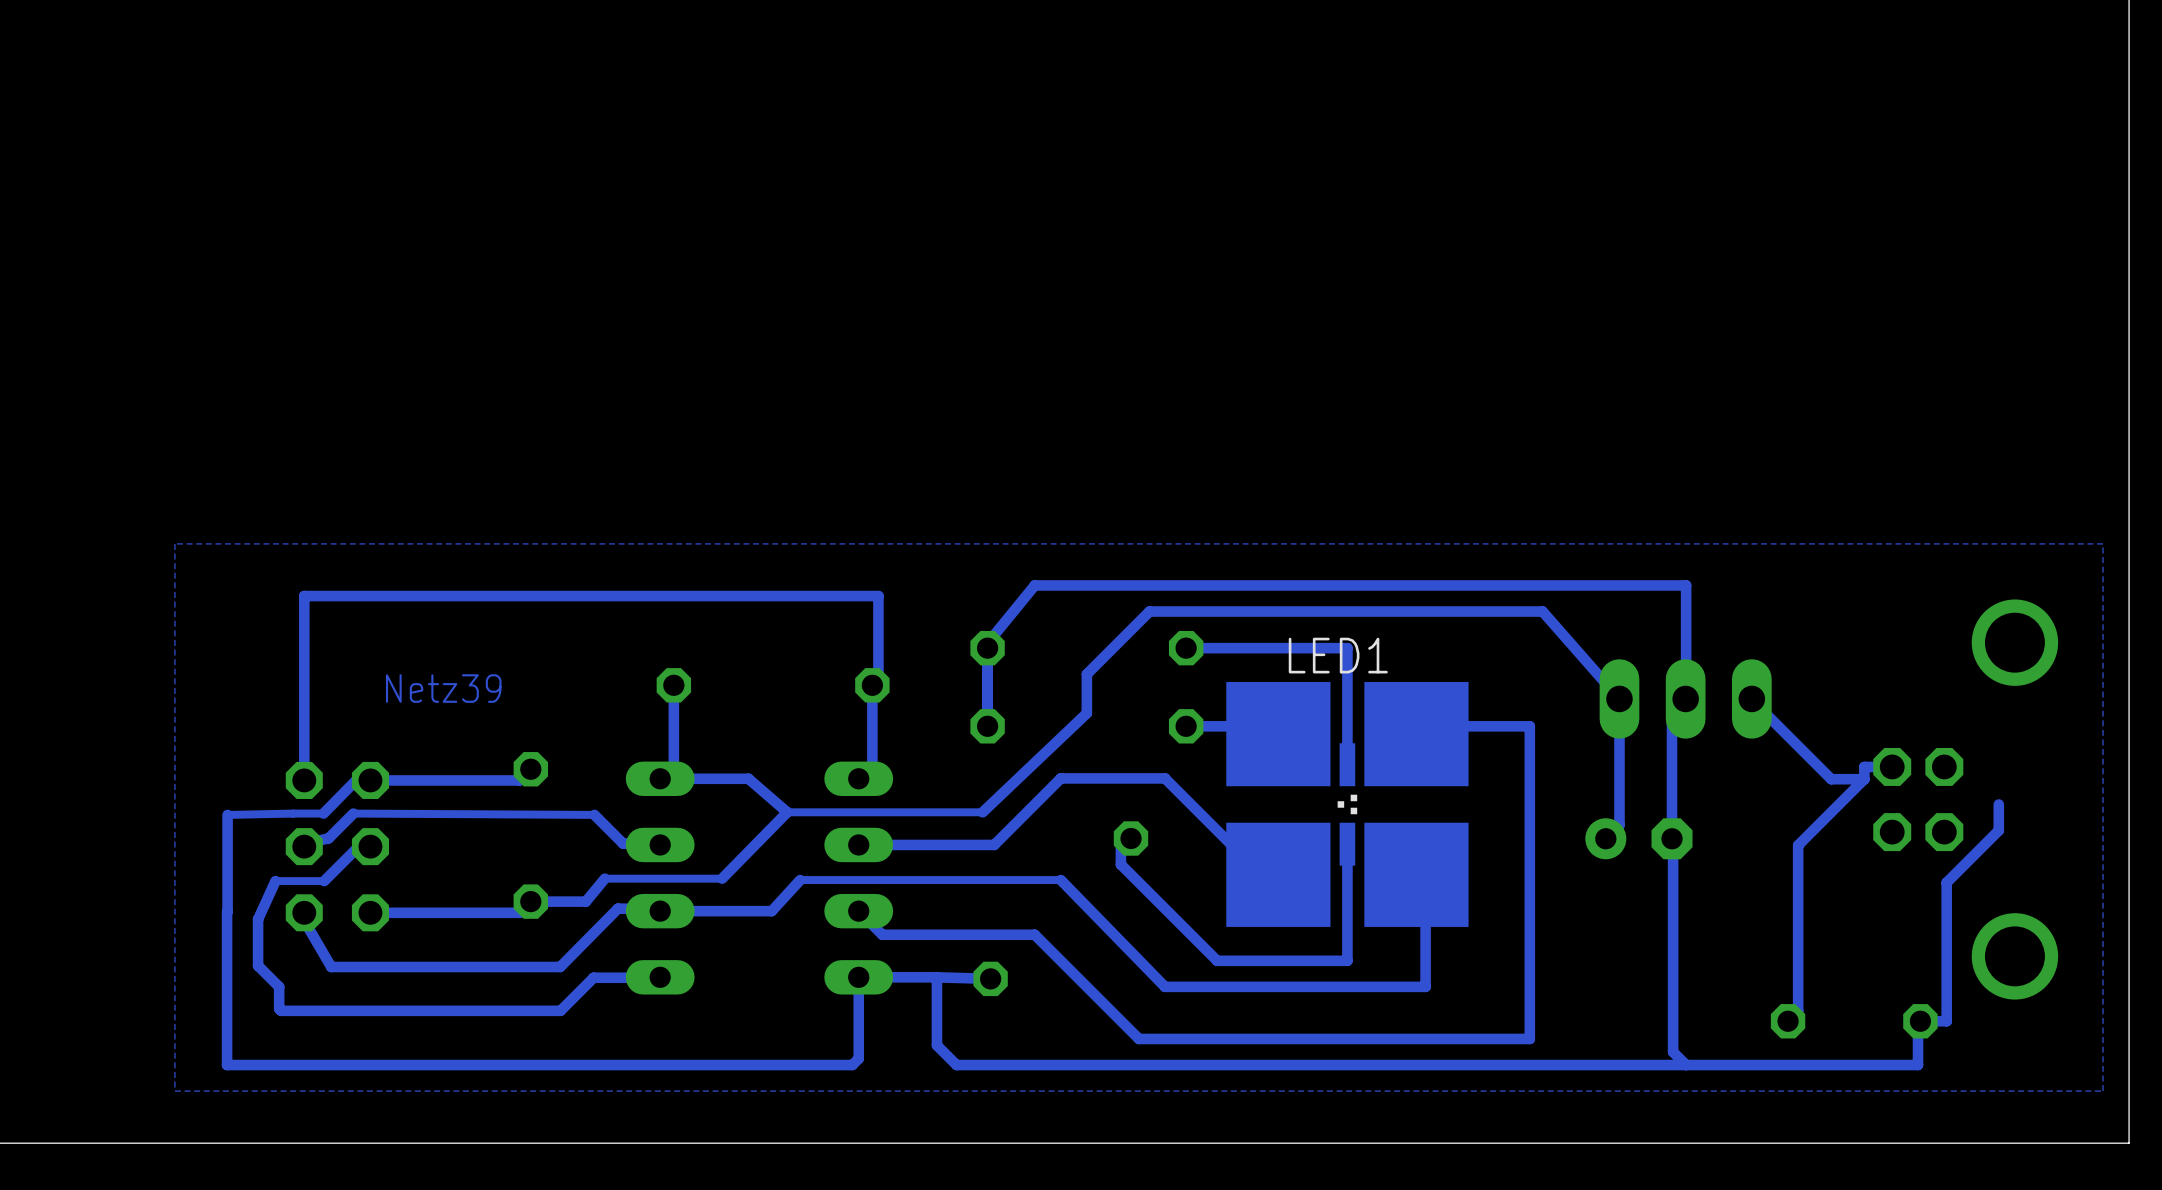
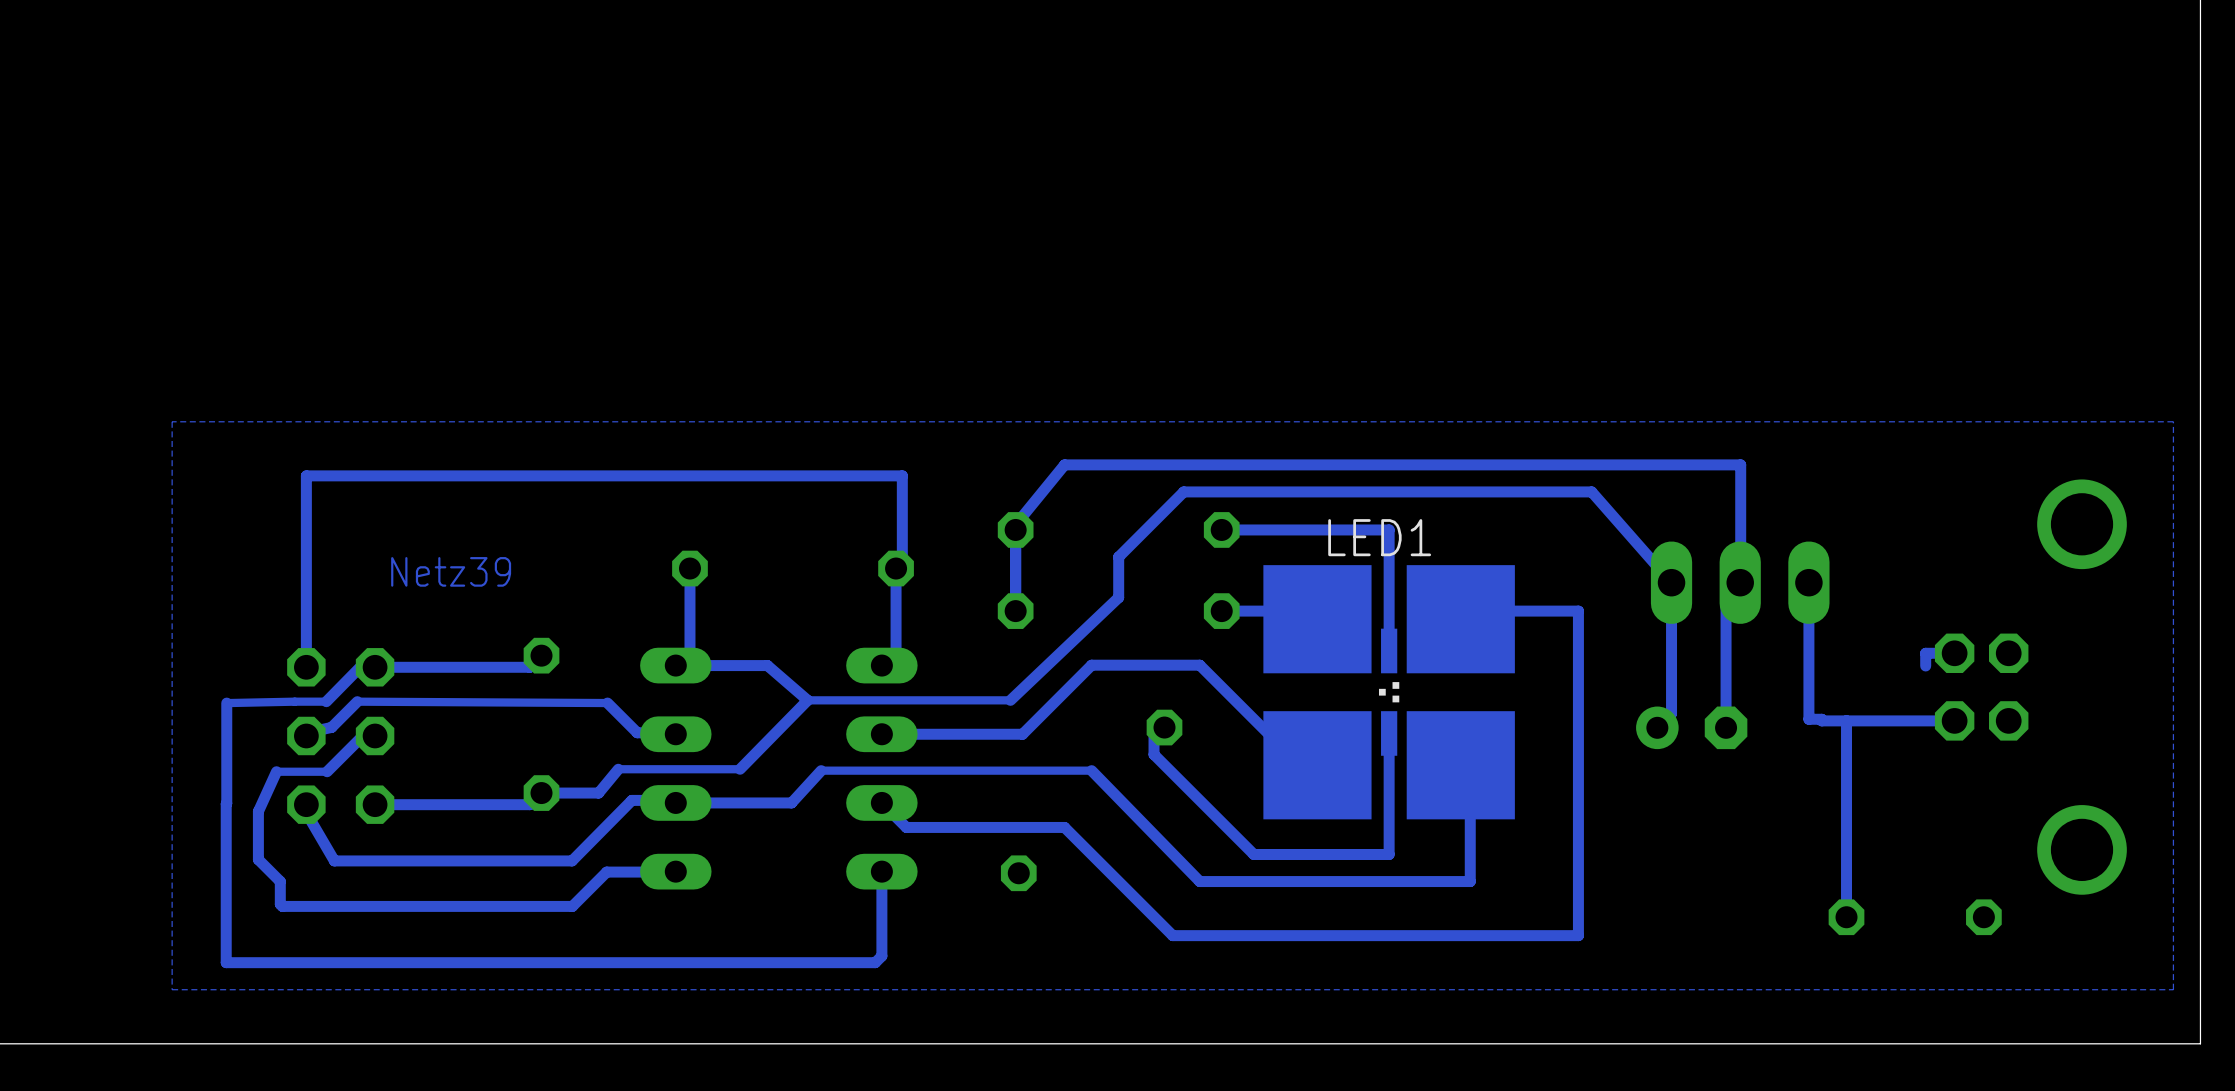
track: (1751, 698) (1831, 779) (1864, 779) (1798, 845) (1798, 1010) (1788, 1021) -> (1846, 720) (1846, 917)
track: none -> (1808, 582) (1808, 719) (1954, 720)
track: (1998, 804) (1998, 830) (1946, 882) (1946, 1021) (1918, 1021) (1918, 1023) (1920, 1023) (1920, 1020) (1910, 1020) (1910, 1025) (1918, 1025) (1918, 1065) (956, 1065) (936, 1045) (936, 977) -> none
track: (1672, 838) (1673, 1052) (1686, 1065) -> none
track: (936, 977) (858, 977) -> none
track: (936, 977) (990, 978) -> none

